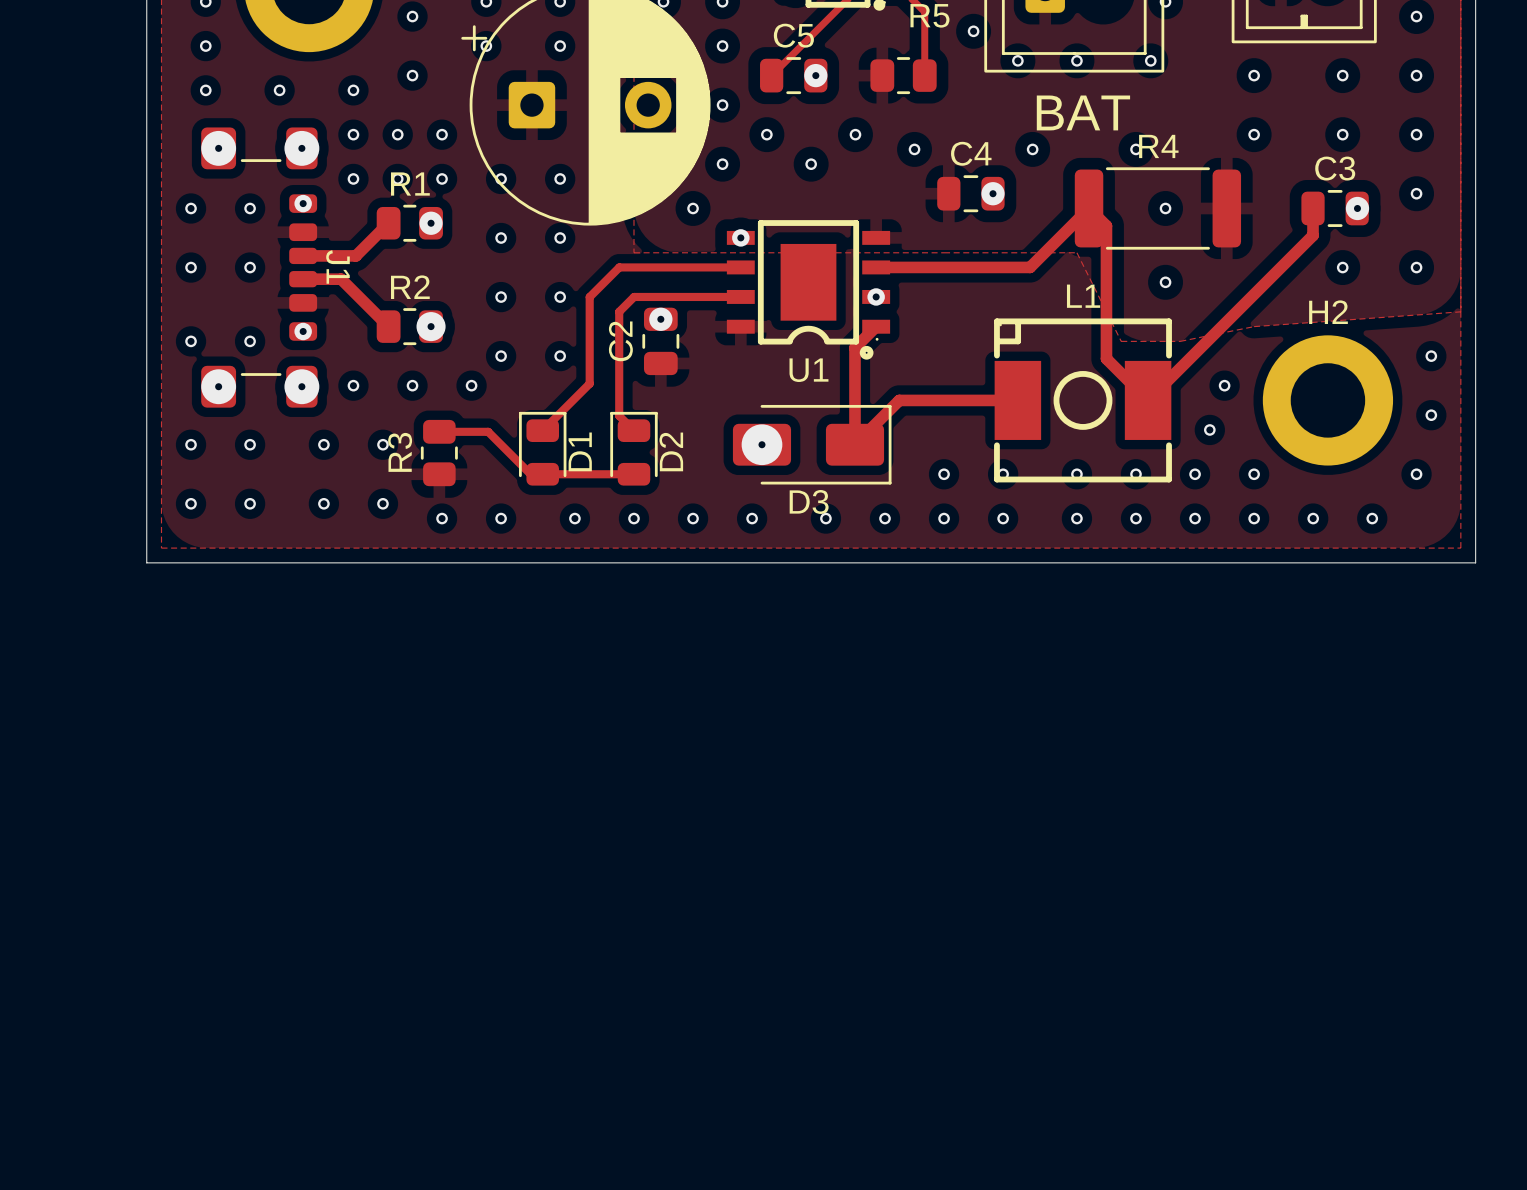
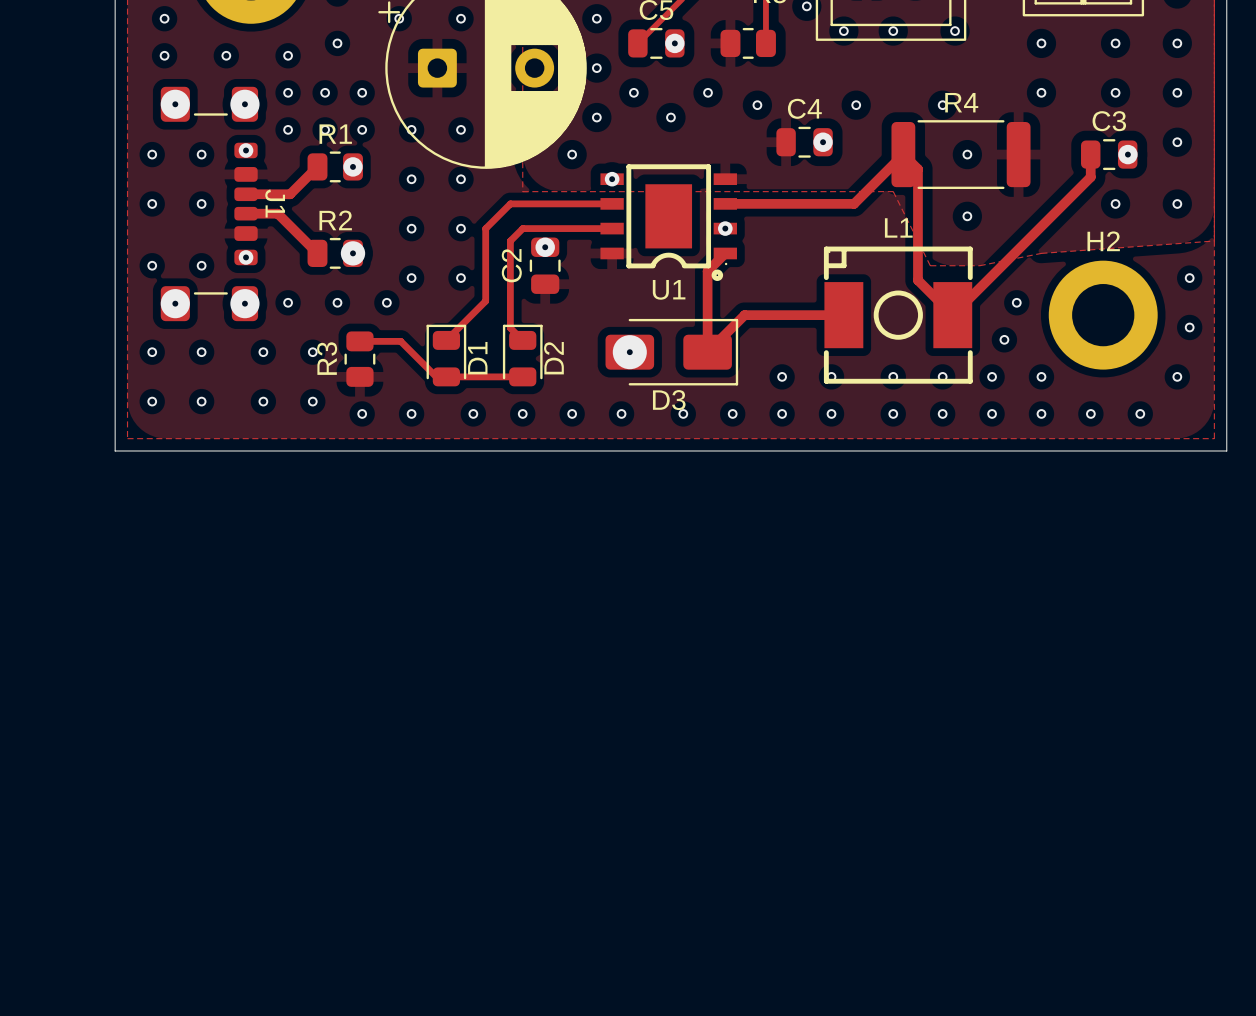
text: BAT (1083, 112) -> none

